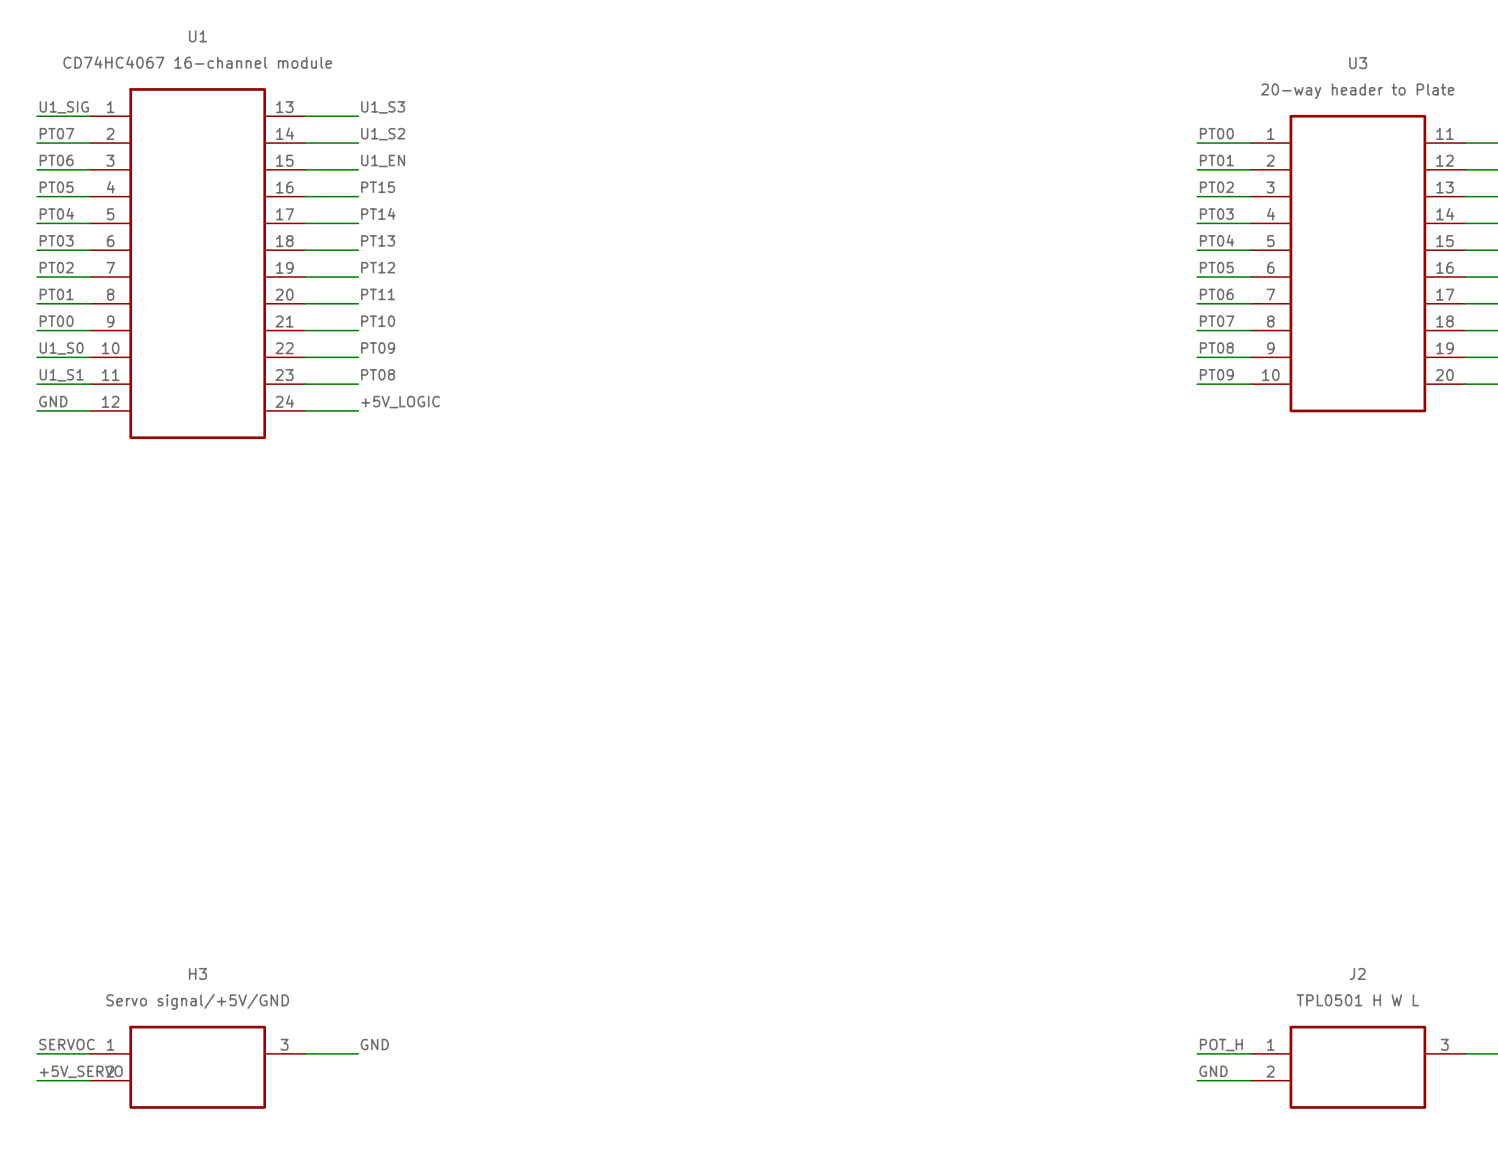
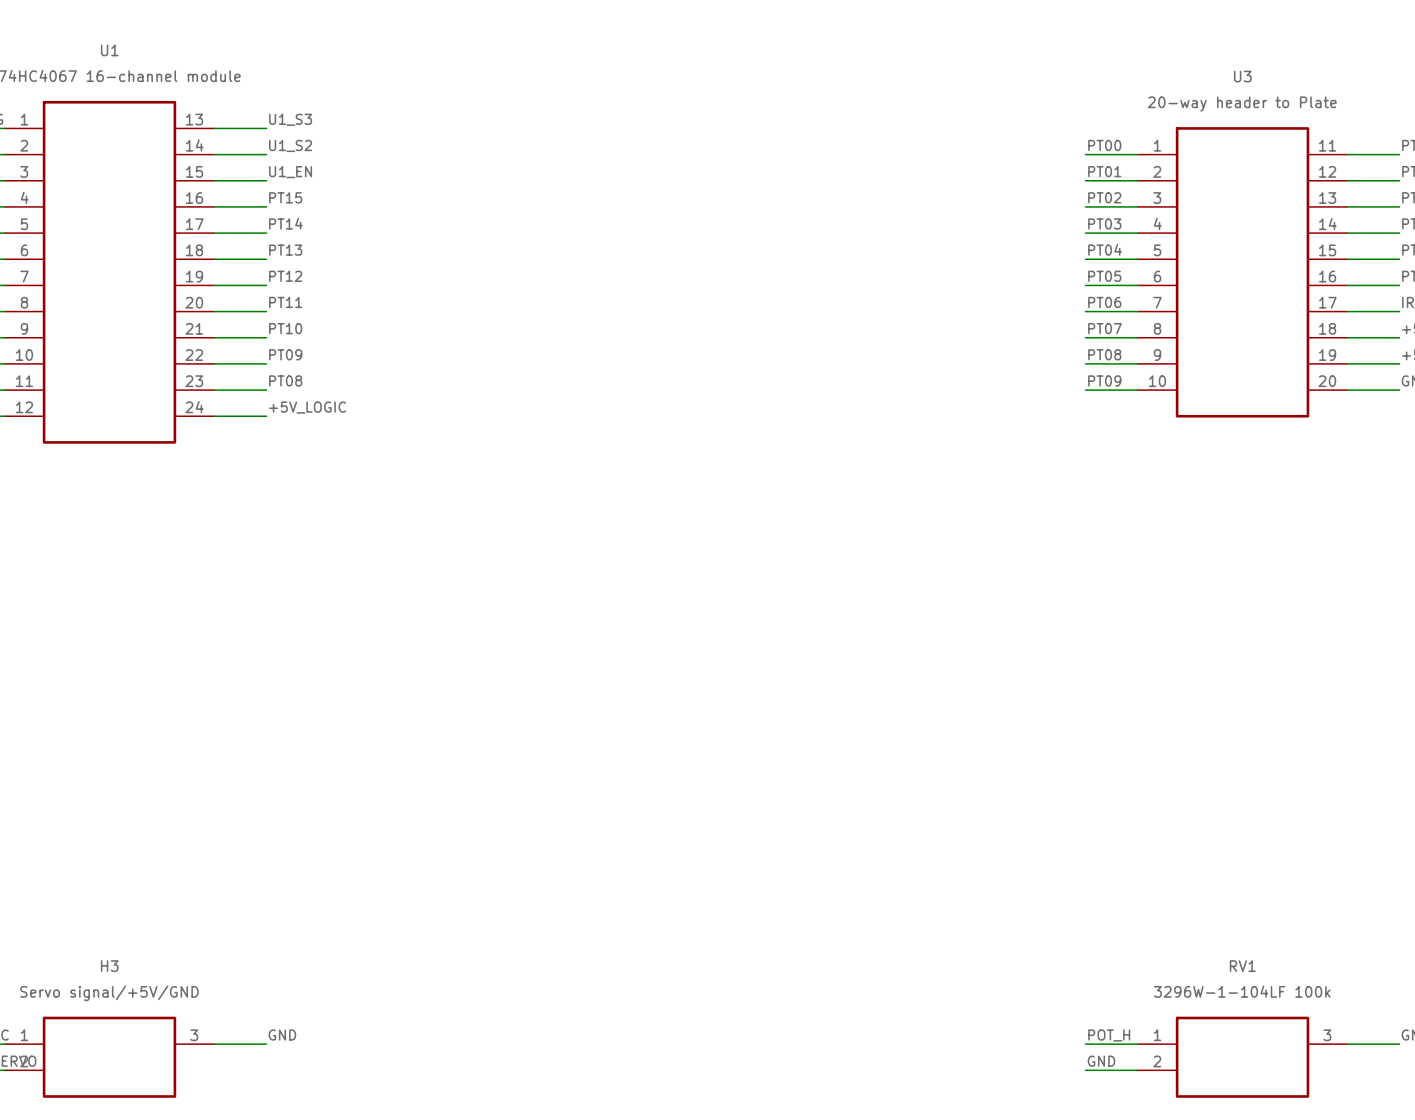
J2 name: J2 (1357, 973) -> RV1 (1242, 966)
J2 value: TPL0501 H W L (1357, 1000) -> 3296W-1-104LF 100k (1242, 991)

